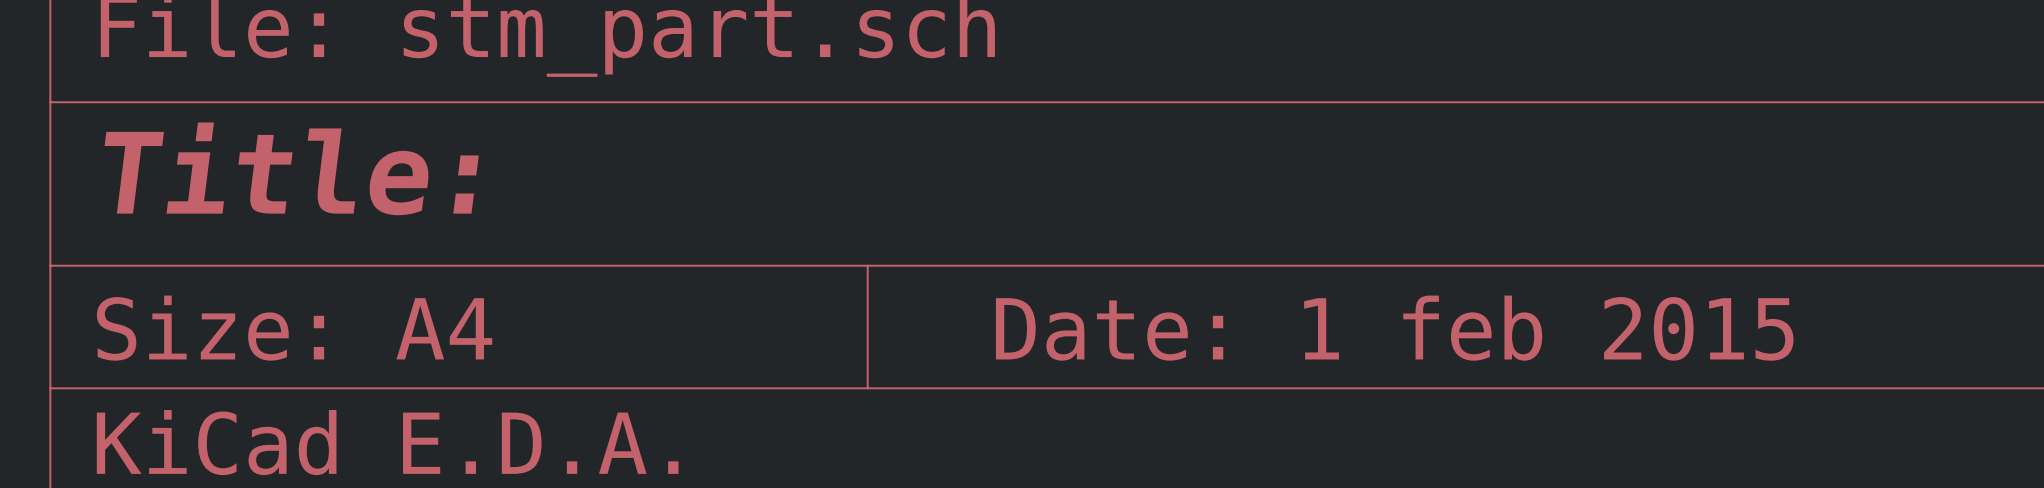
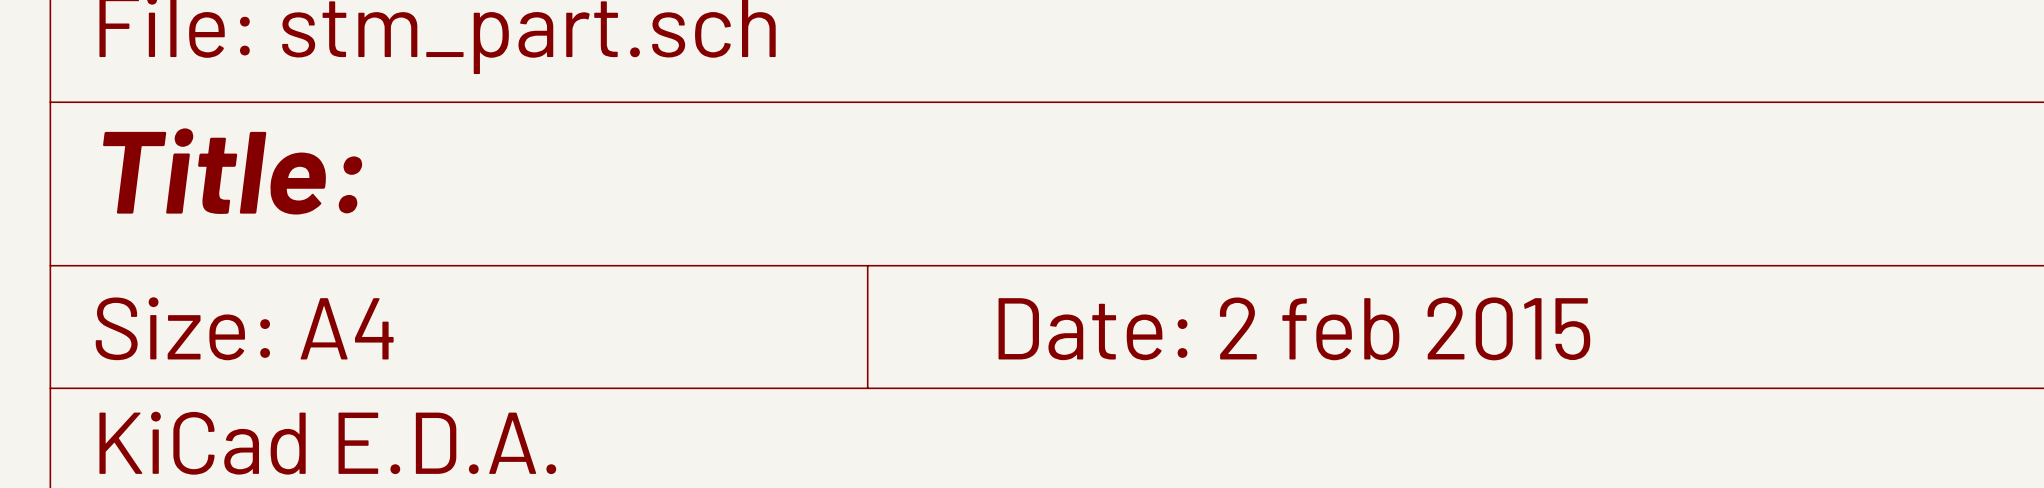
title block: Date: 1 feb 2015 (1394, 328) -> Date: 2 feb 2015 (1294, 328)

